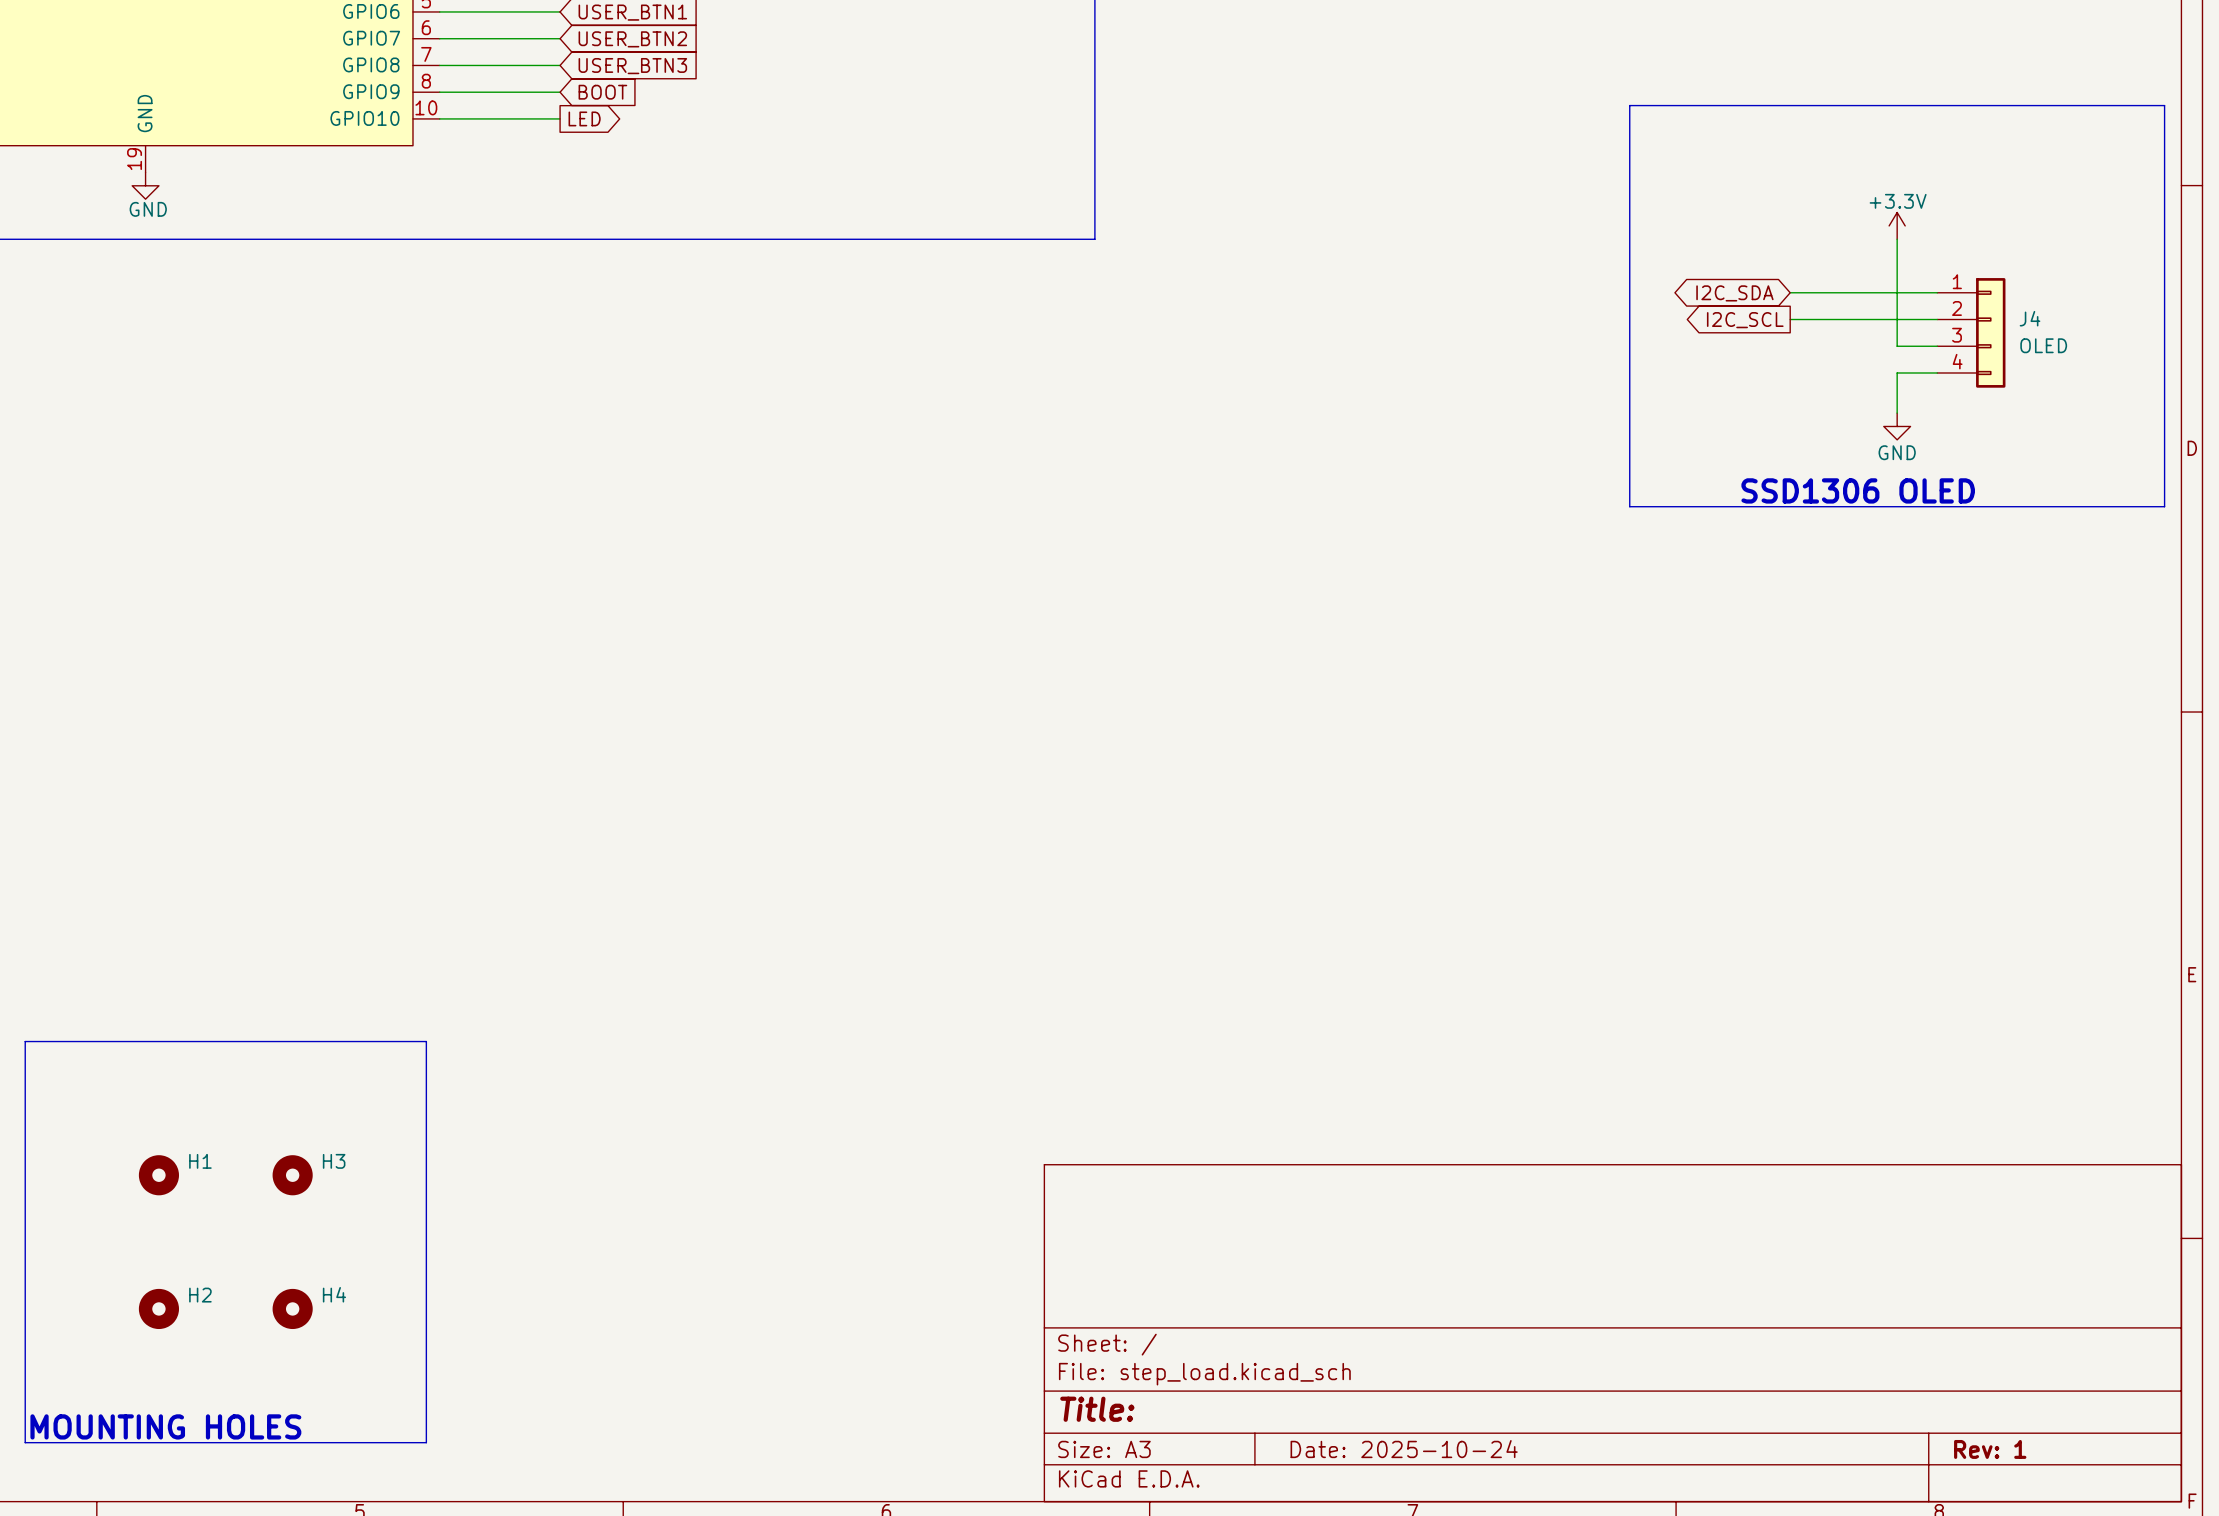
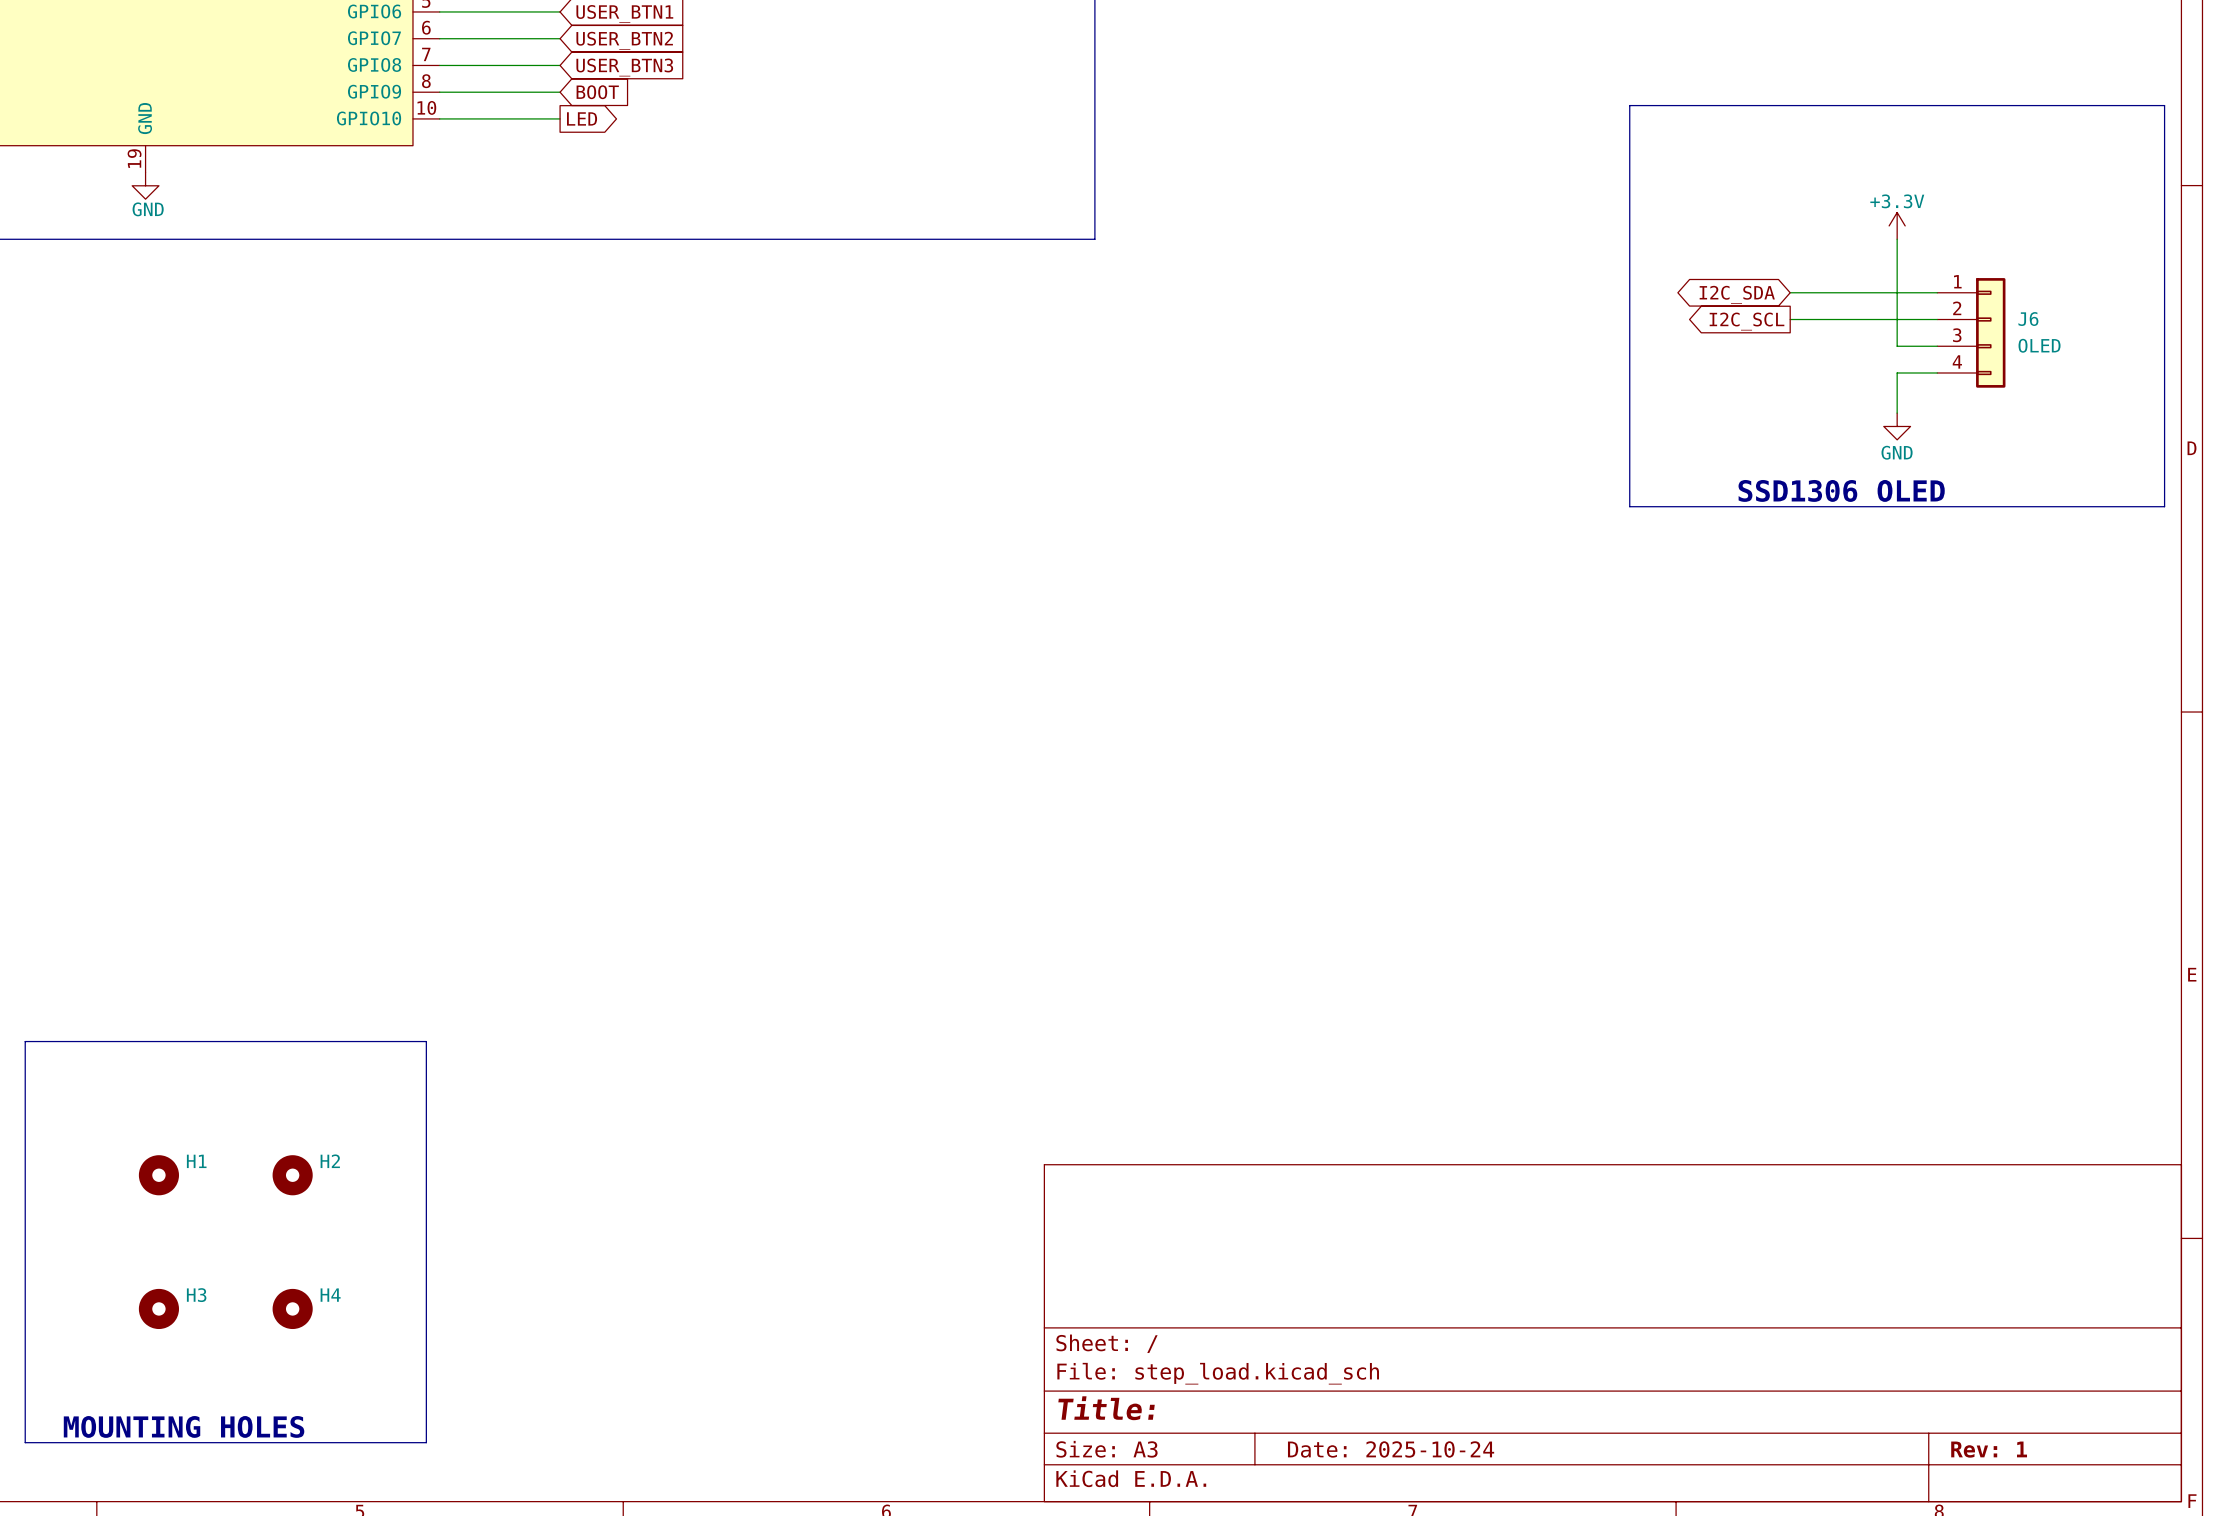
J4 name: J4 (2030, 318) -> J6 (2028, 319)
H3 name: H3 (334, 1161) -> H2 (330, 1161)
H2 name: H2 (200, 1295) -> H3 (196, 1295)

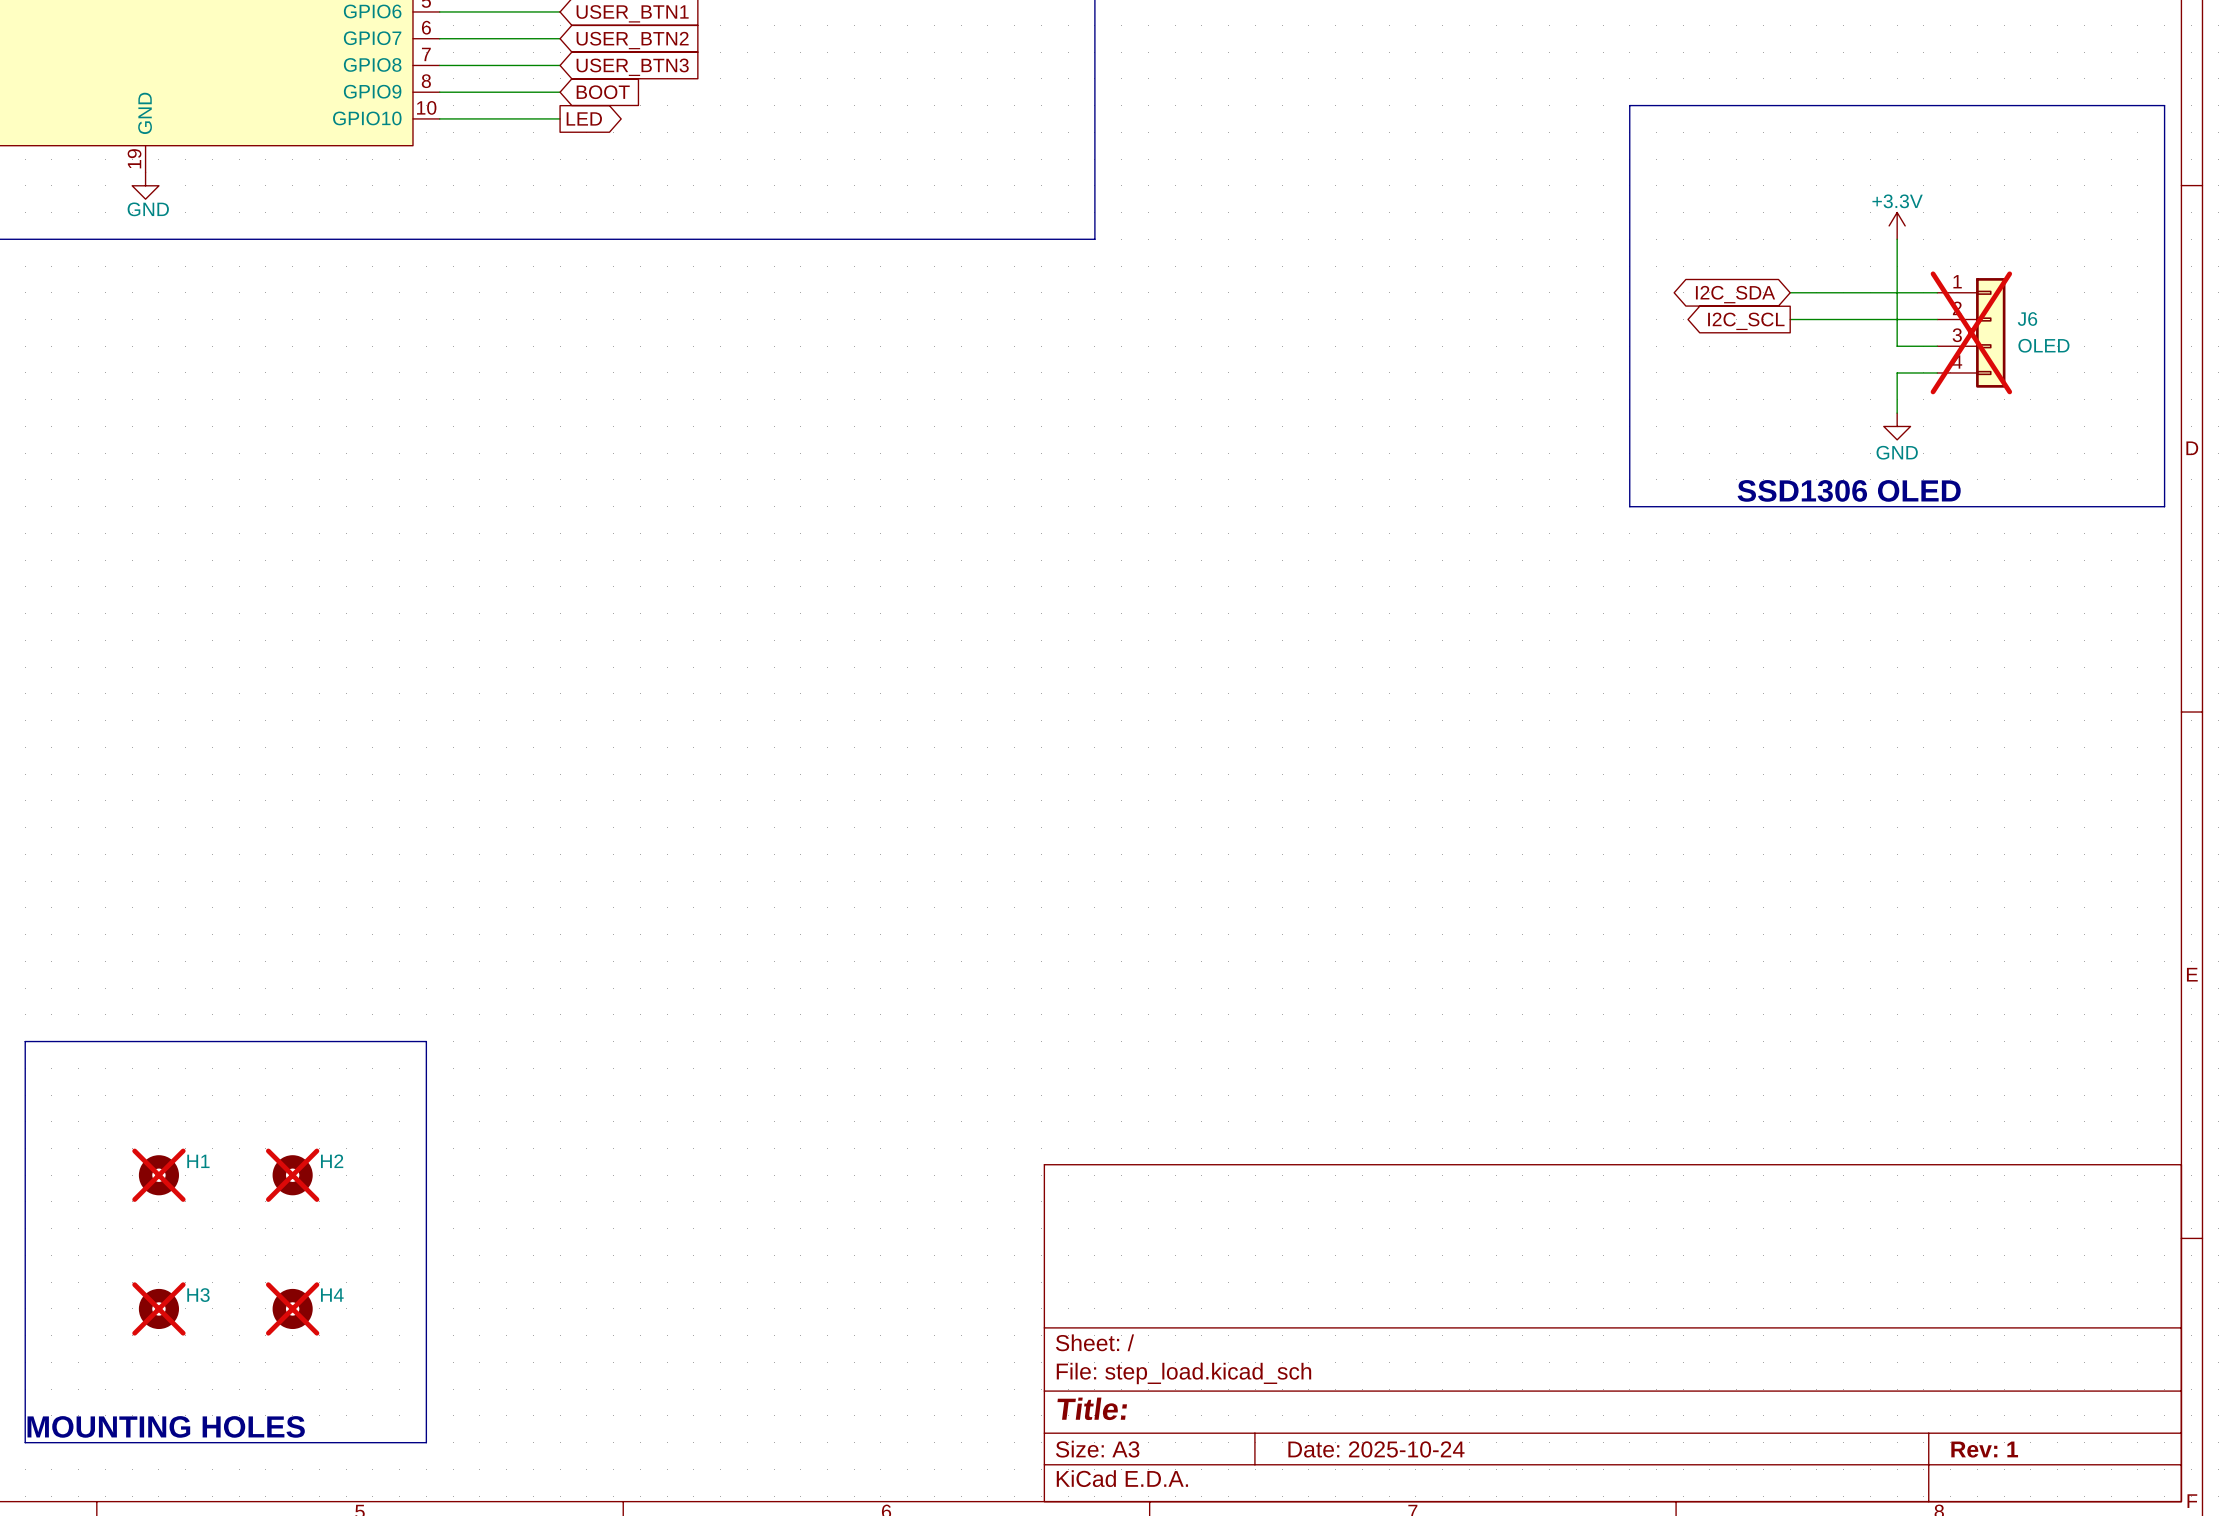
J6 do-not-place cross: none -> (1971, 332)
H1 do-not-place cross: none -> (158, 1175)
H2 do-not-place cross: none -> (292, 1175)
H3 do-not-place cross: none -> (158, 1308)
H4 do-not-place cross: none -> (292, 1308)

